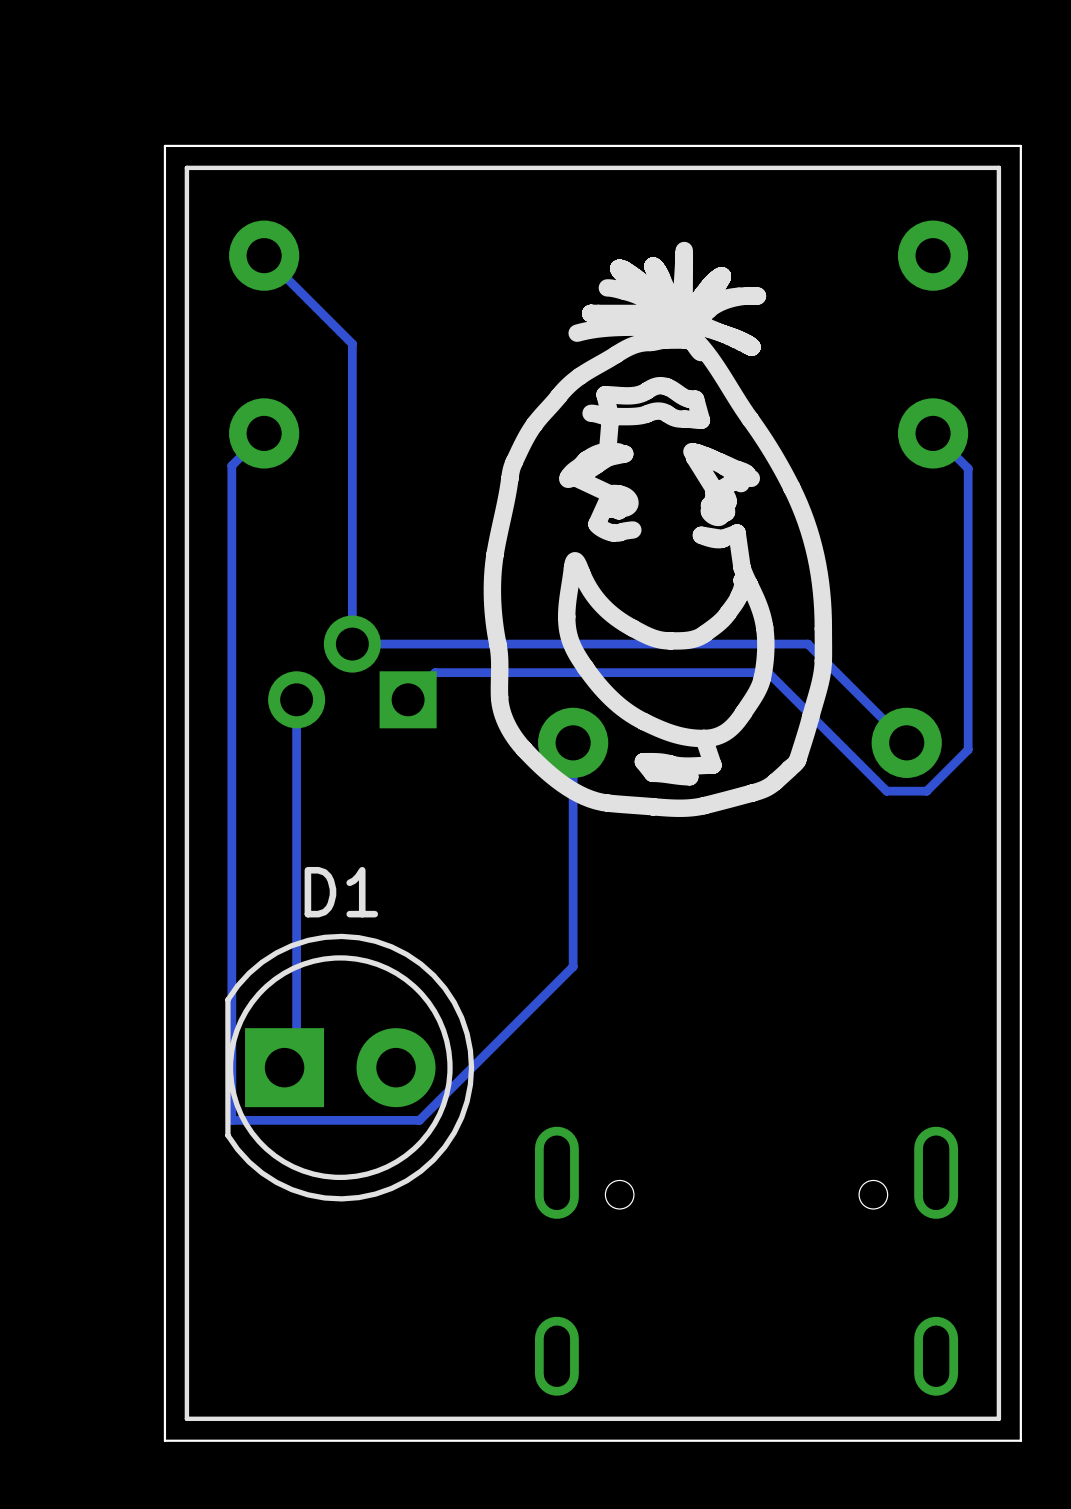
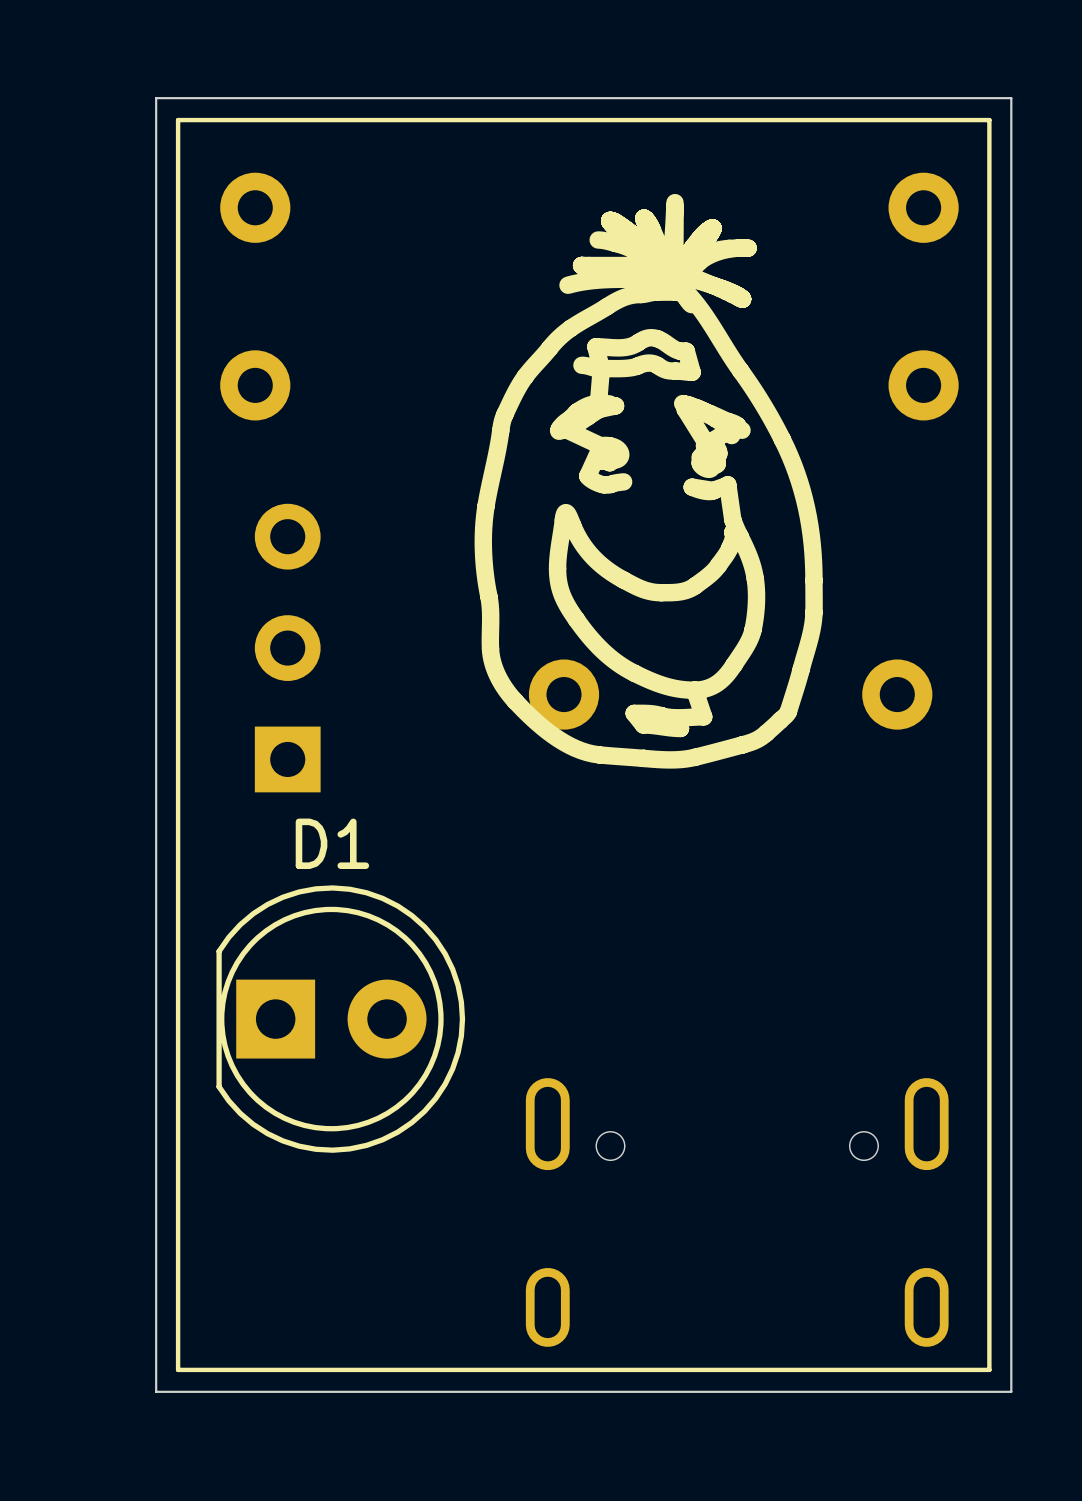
track: (264, 255) (352, 343) (352, 644) (807, 644) (906, 742) -> none
track: (264, 433) (231, 465) (231, 1120) (419, 1120) (573, 966) (573, 742) -> none
track: (933, 433) (968, 468) (968, 749) (926, 791) (886, 791) (768, 672) (435, 672) (408, 699) -> none
part: (352, 671) -> none
part: none -> (287, 648)
track: (296, 699) (296, 1055) (284, 1067) -> none

